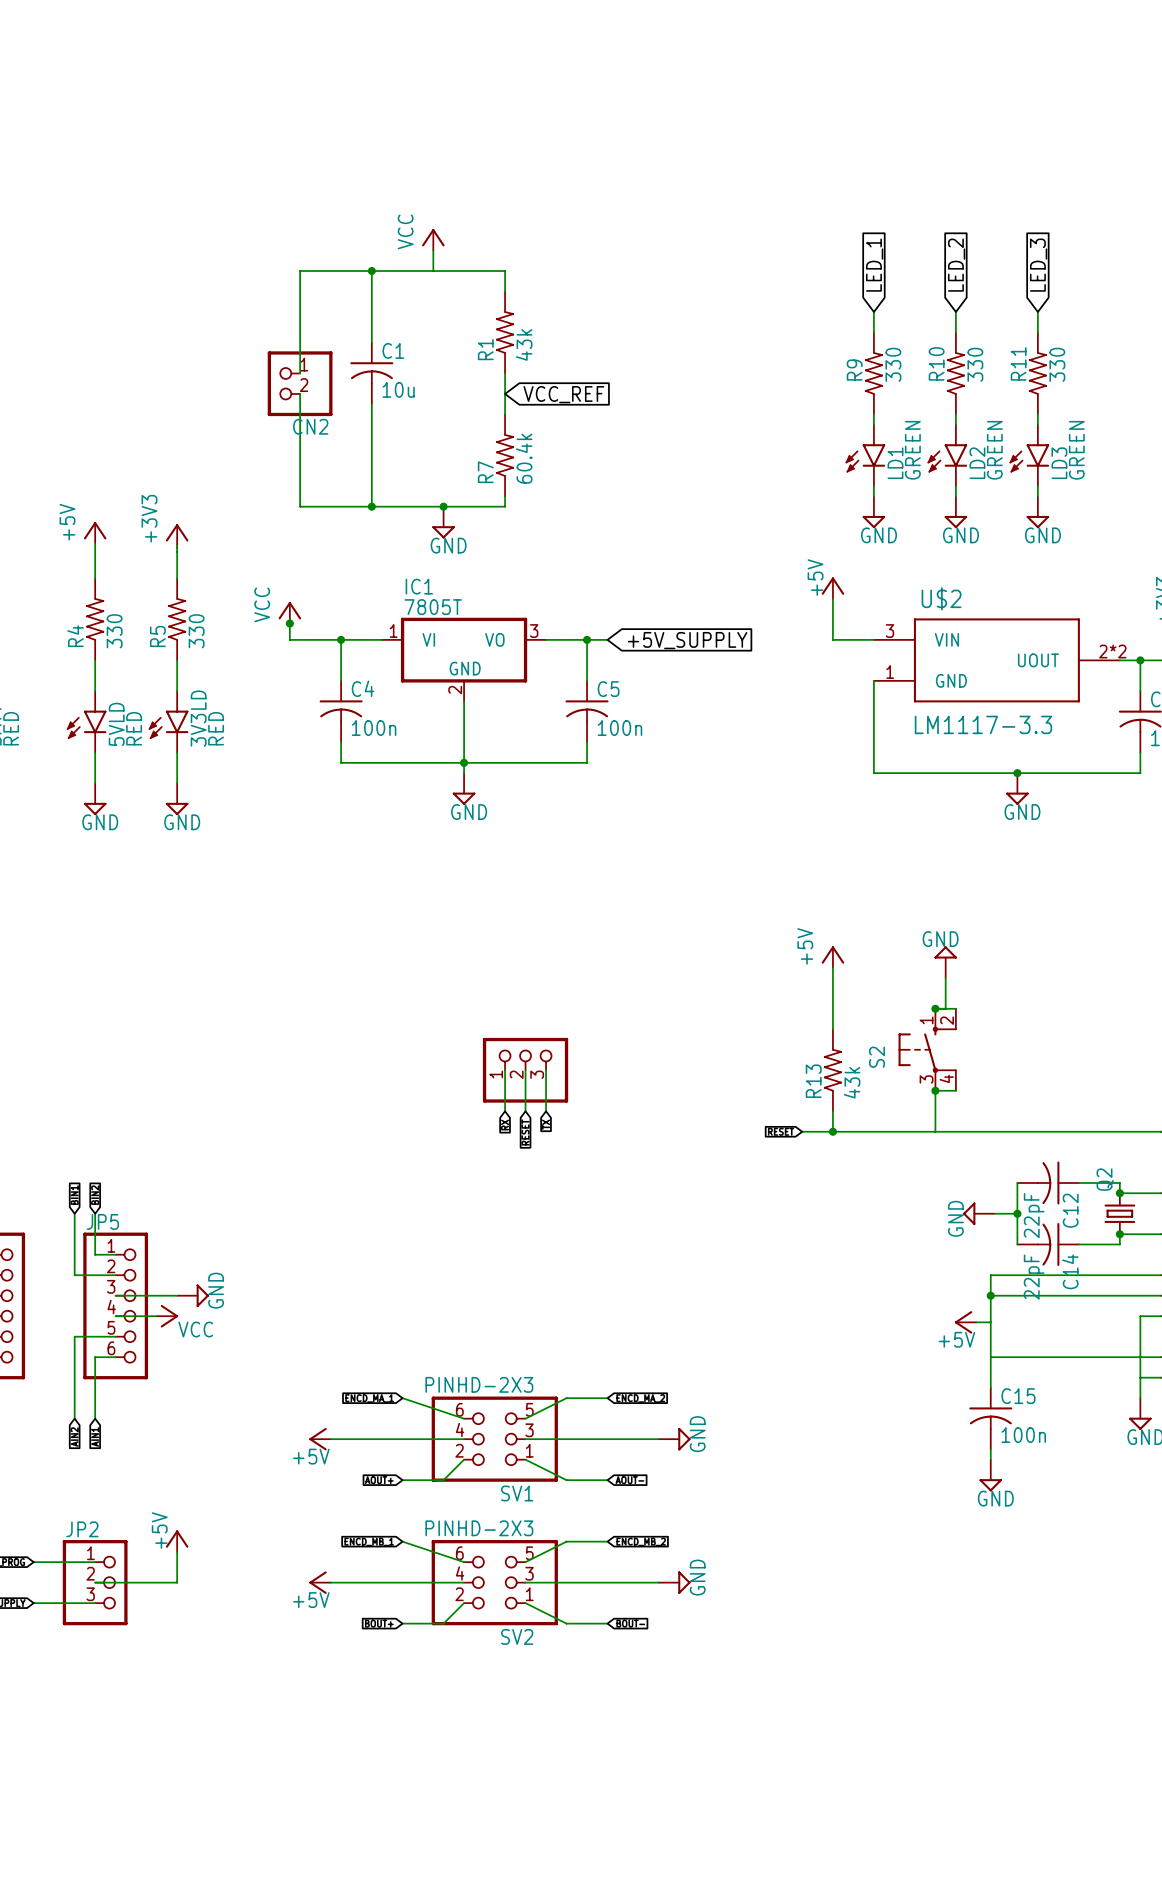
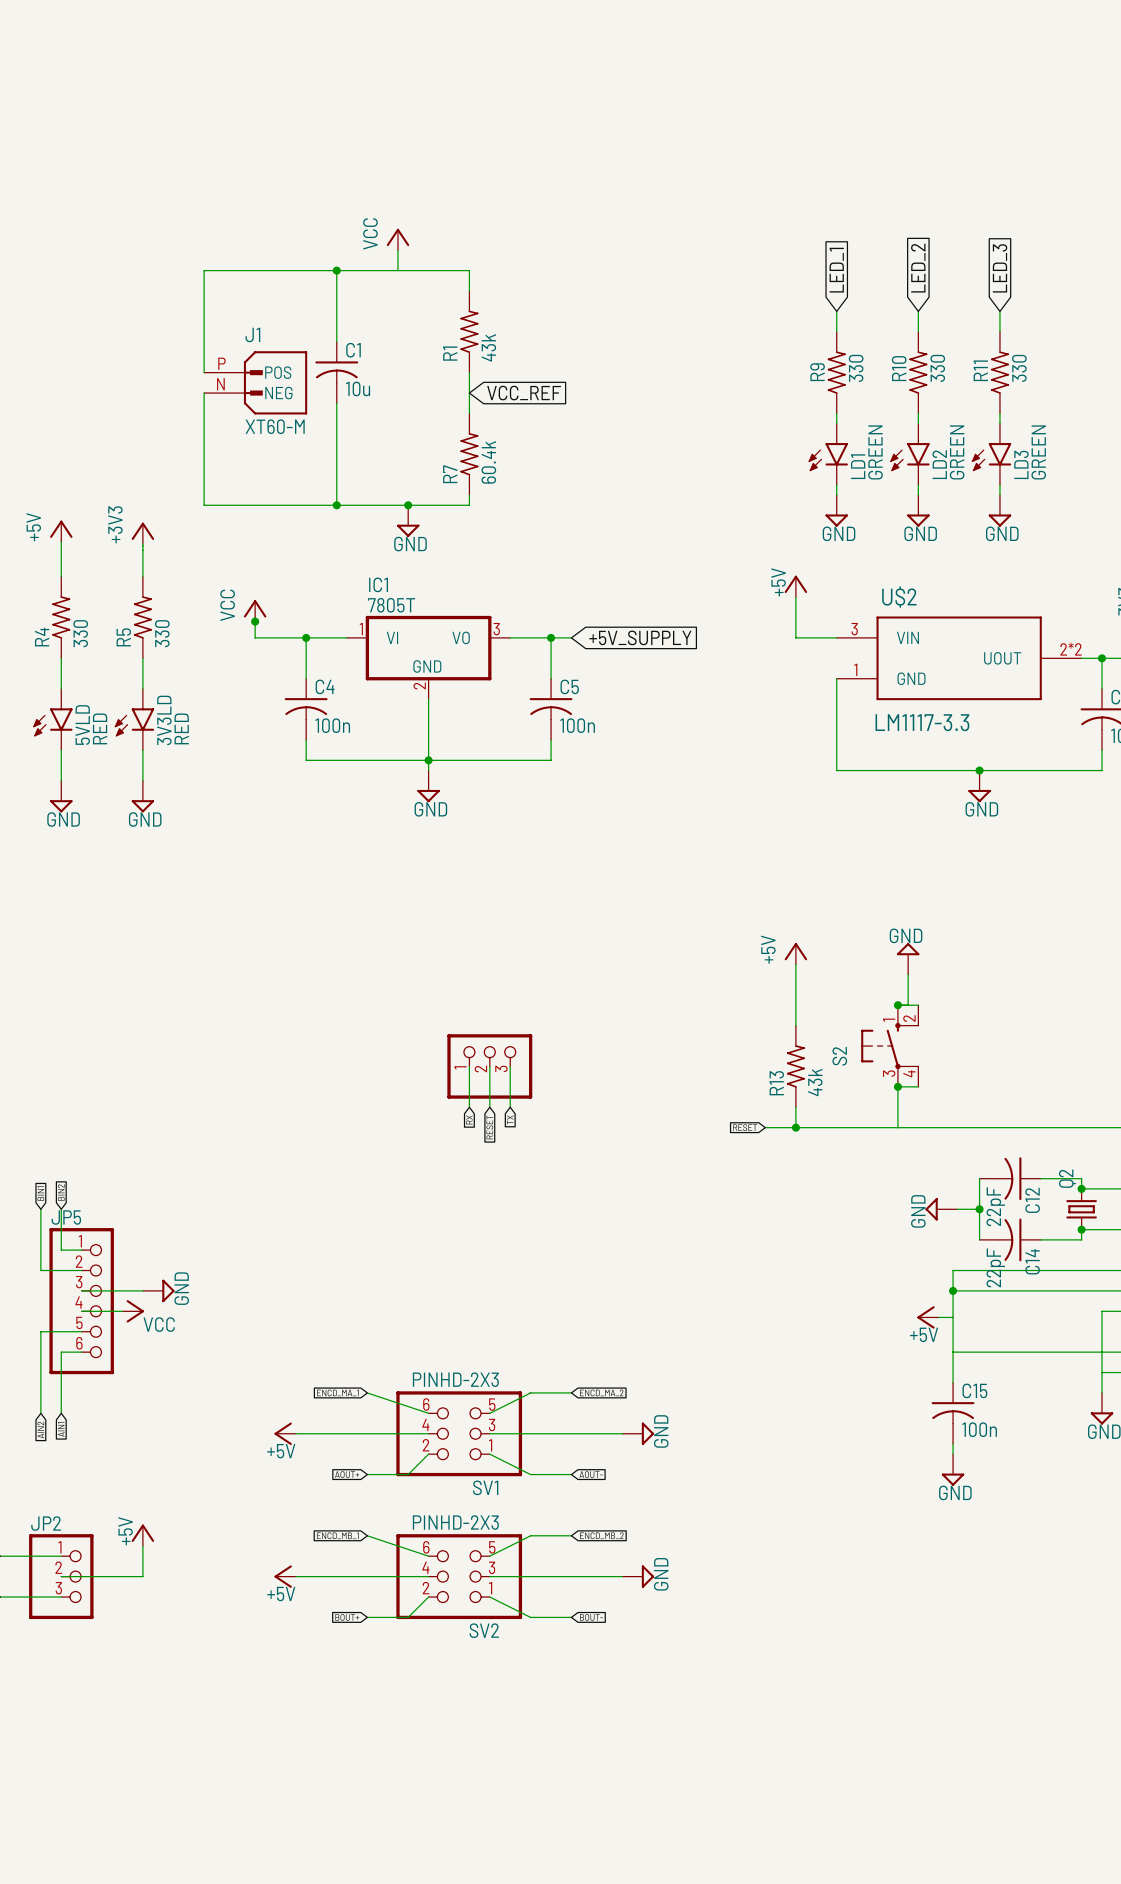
wire: (300, 271) (300, 373) -> (265, 270) (204, 270) (204, 372)
J1: none -> XT60-M (255, 382)
CN2: (300, 383) -> none
wire: (300, 393) (300, 506) -> (204, 393) (204, 505) (265, 505)

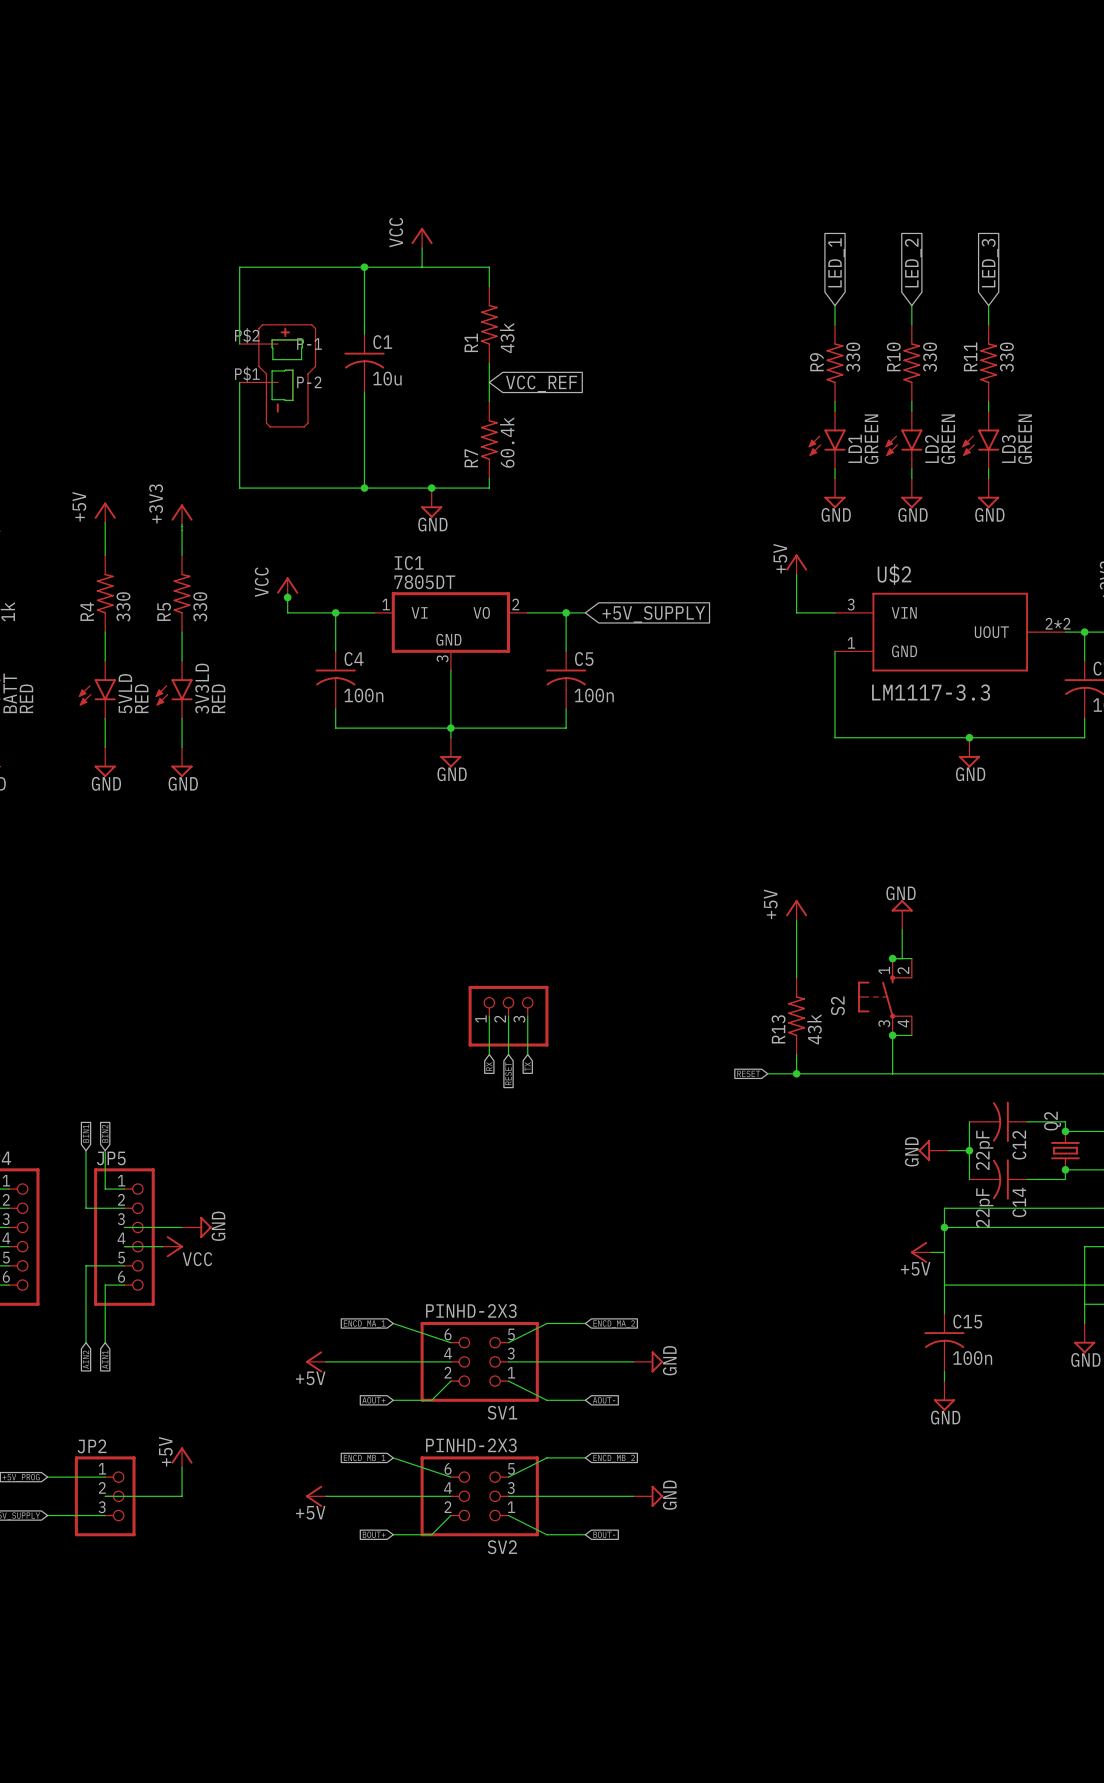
wire: (204, 352) (204, 372) -> none
J1: XT60-M (255, 382) -> none
part: none -> (277, 375)
IC1 value: 7805T (391, 605) -> 7805DT (424, 582)
IC1 pin number: 3 (496, 629) -> 2 (515, 604)
IC1 pin number: 2 (419, 685) -> 3 (442, 658)

